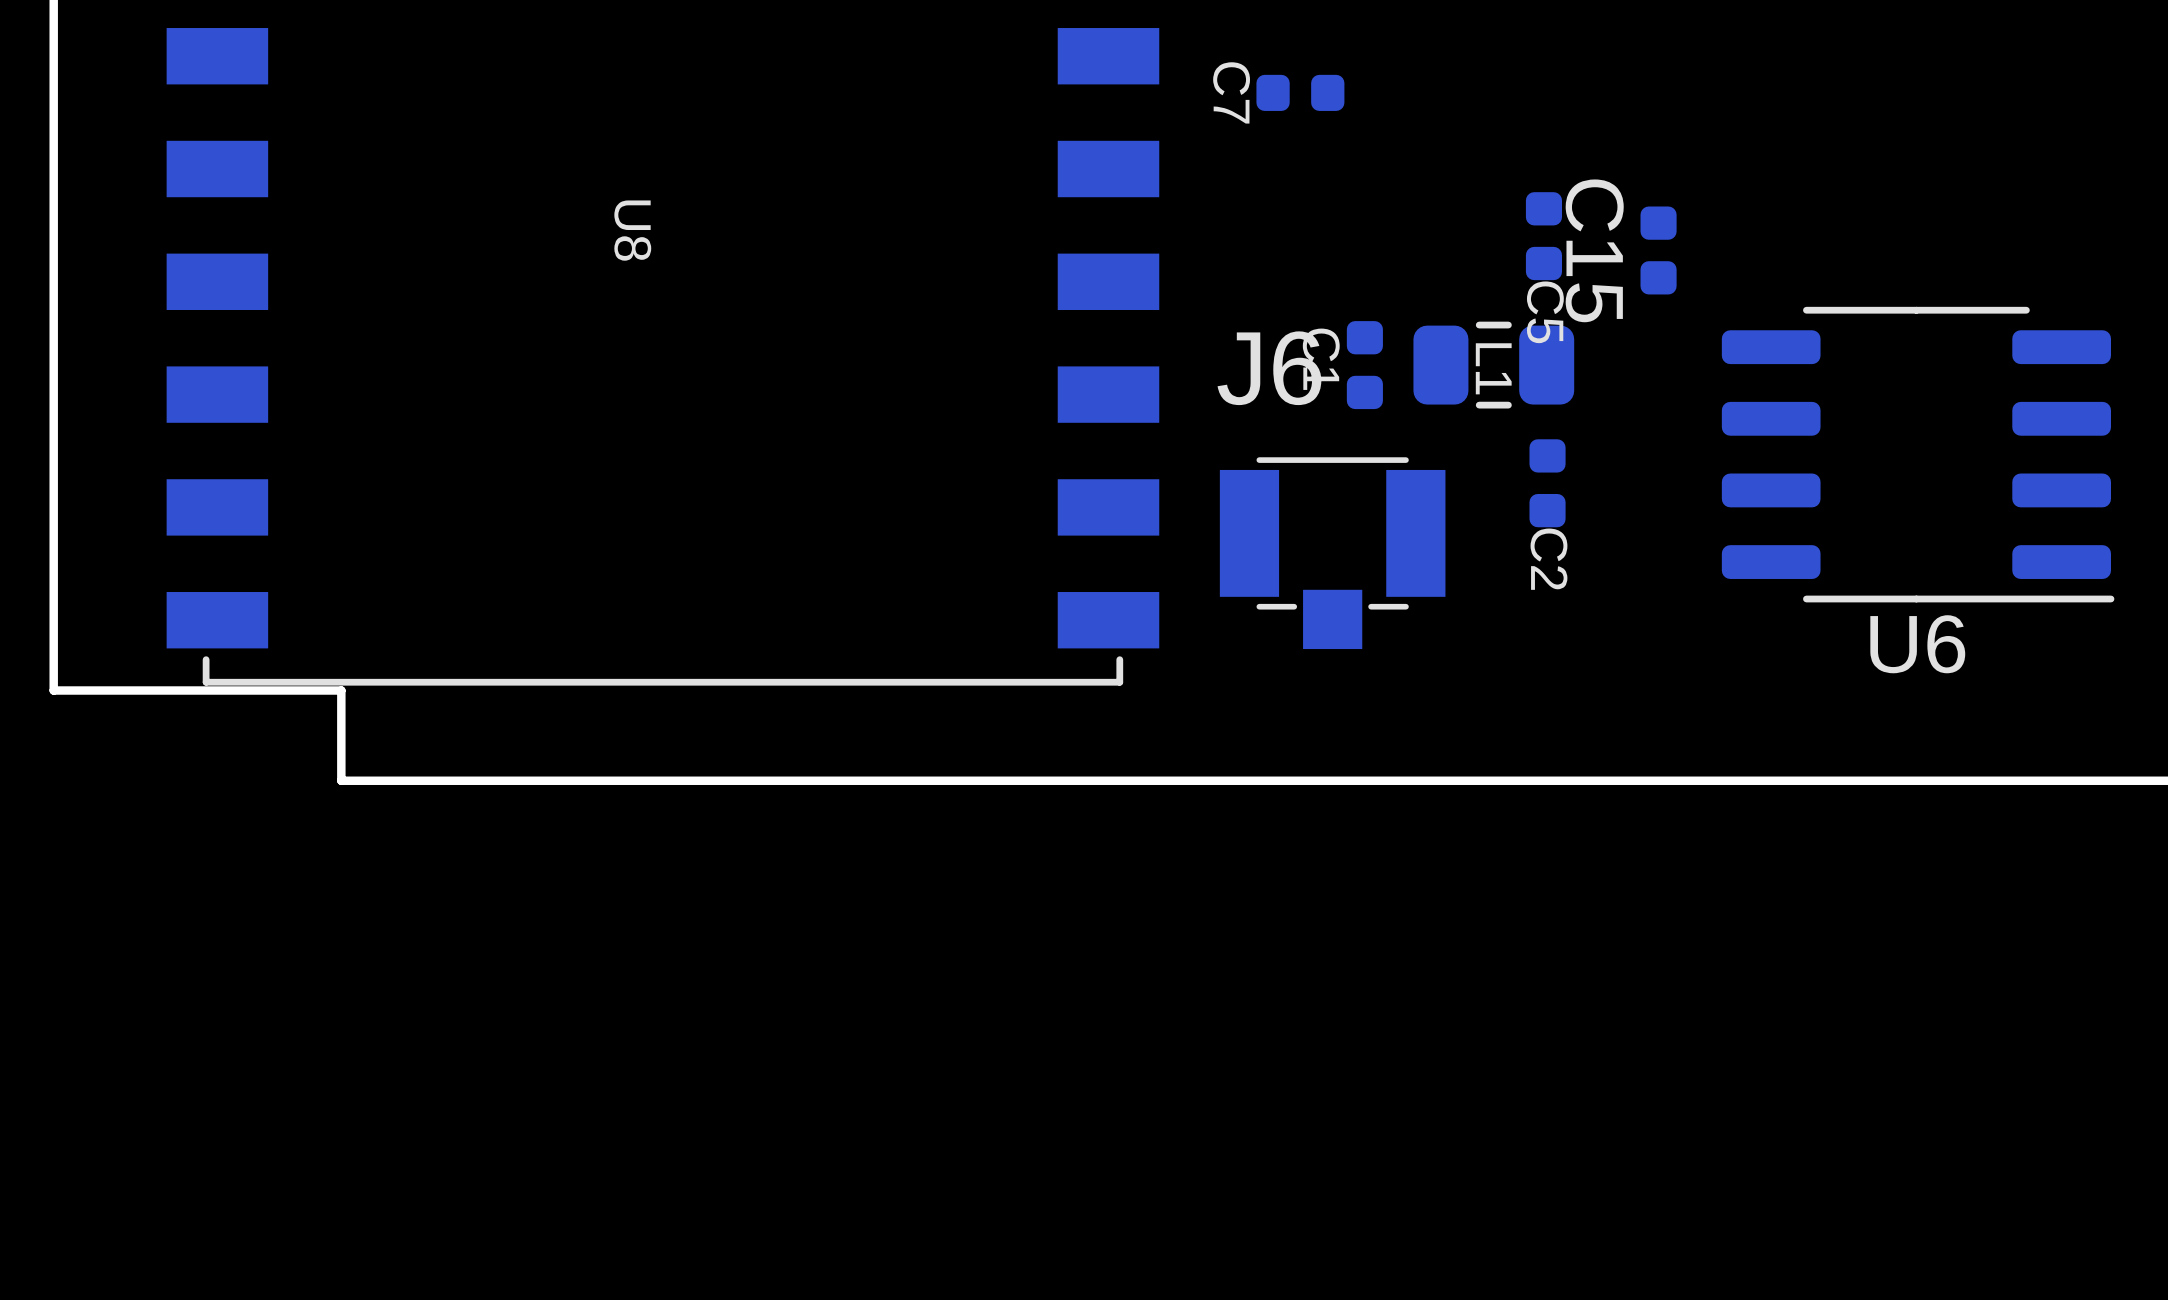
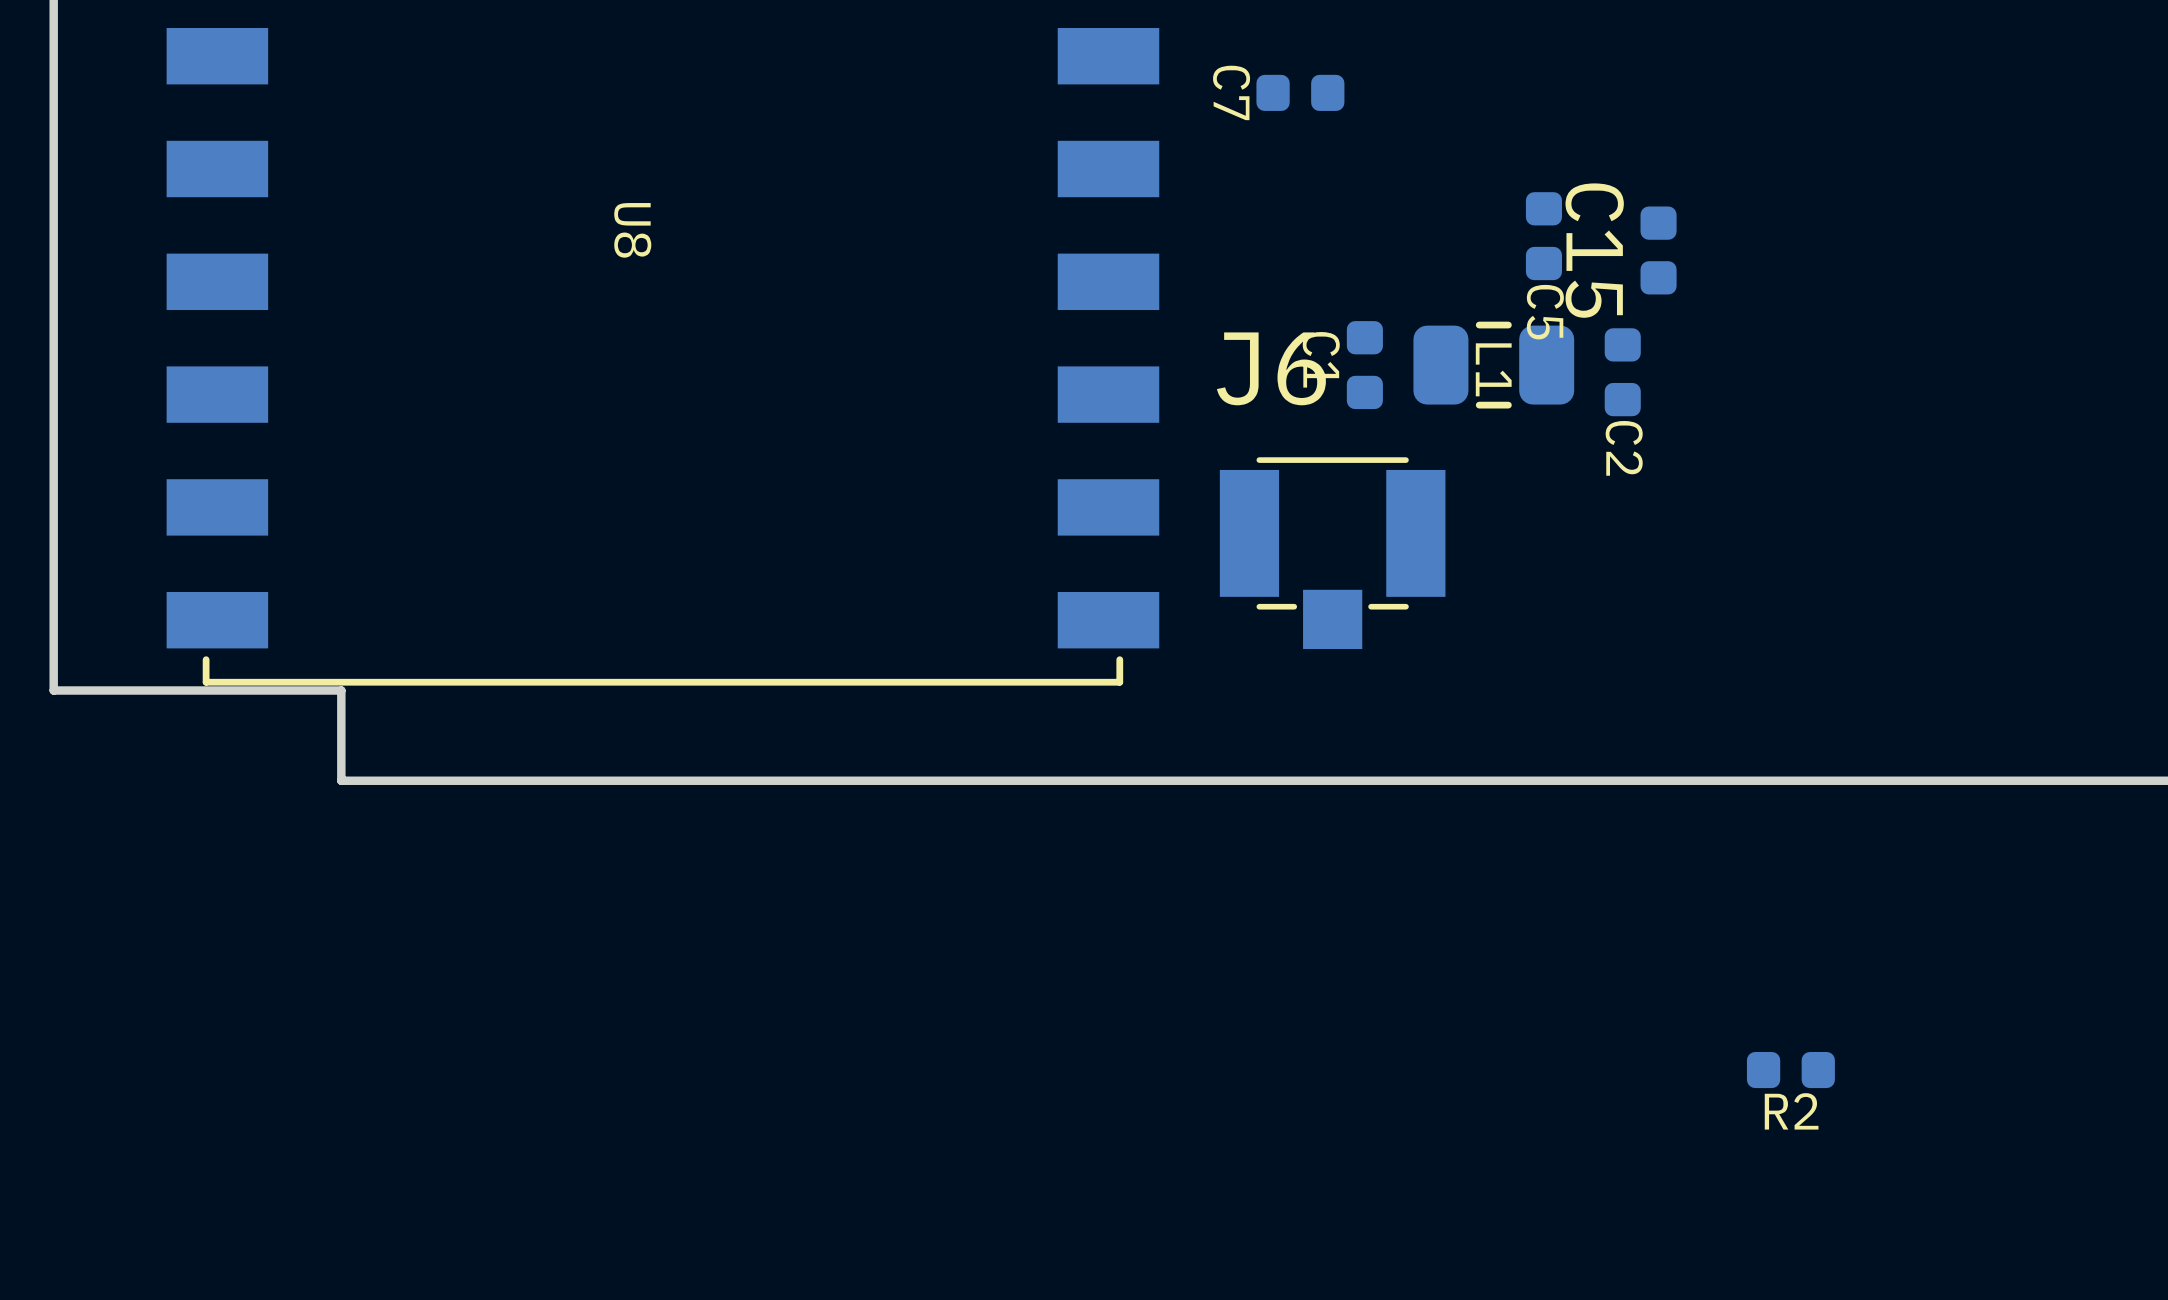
U6: (1918, 454) -> none
C2 position: (1547, 483) -> (1622, 372)
R2: none -> (1790, 1070)

